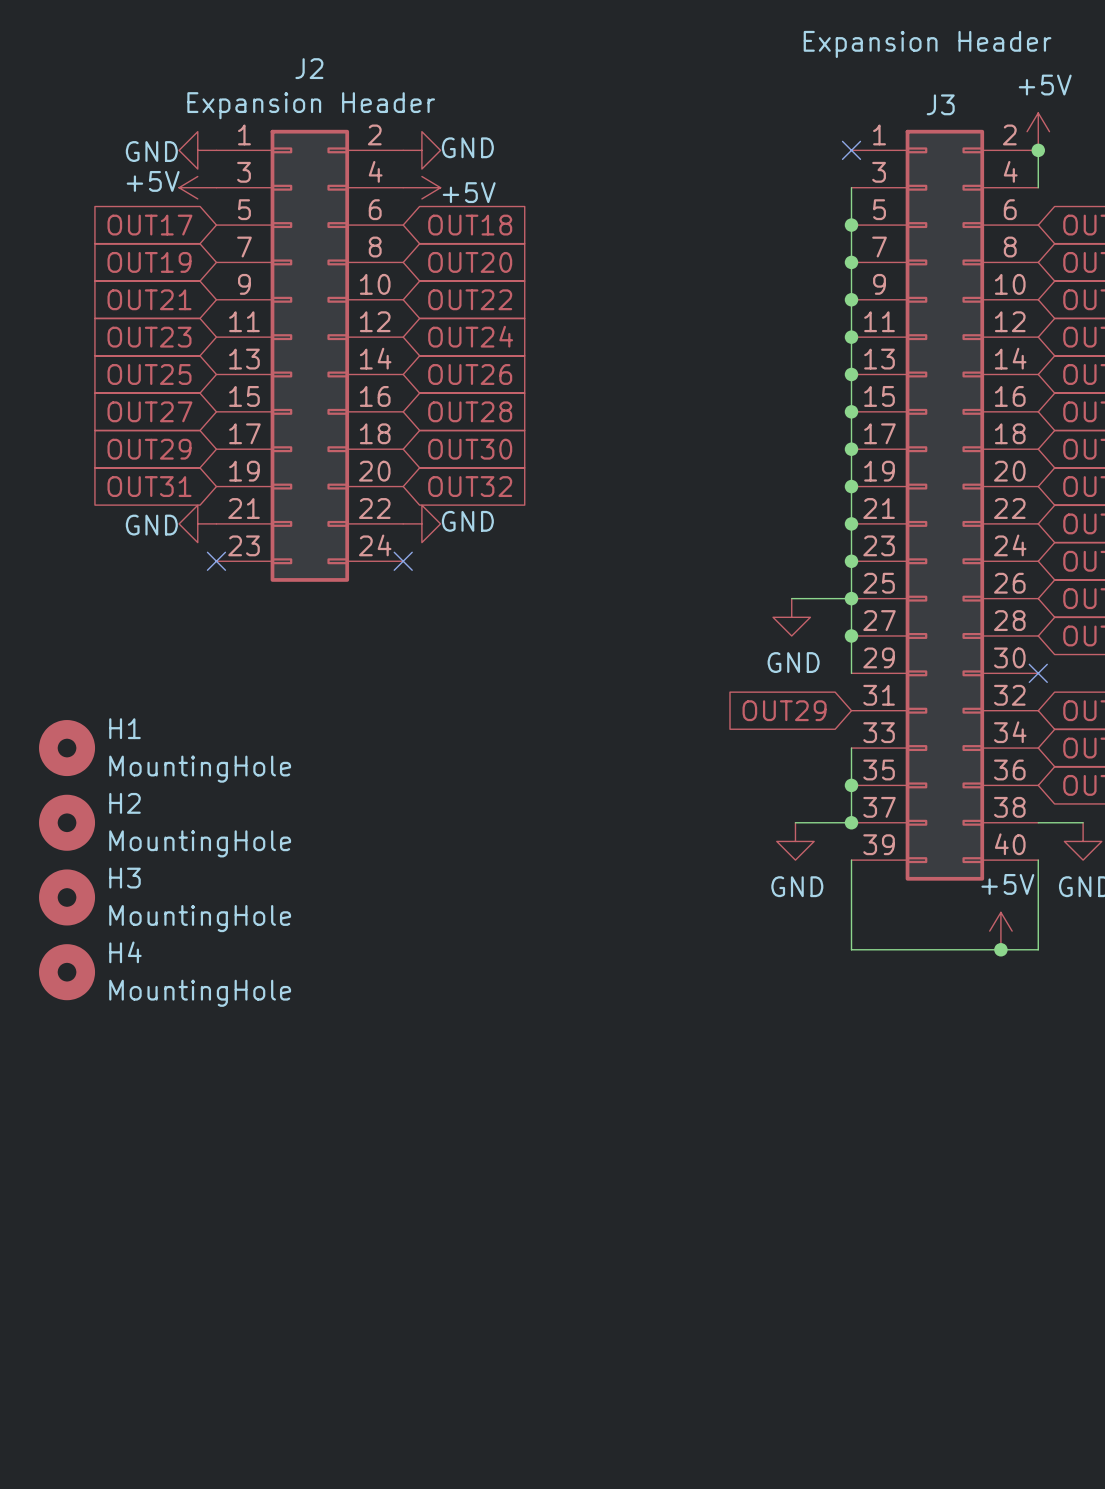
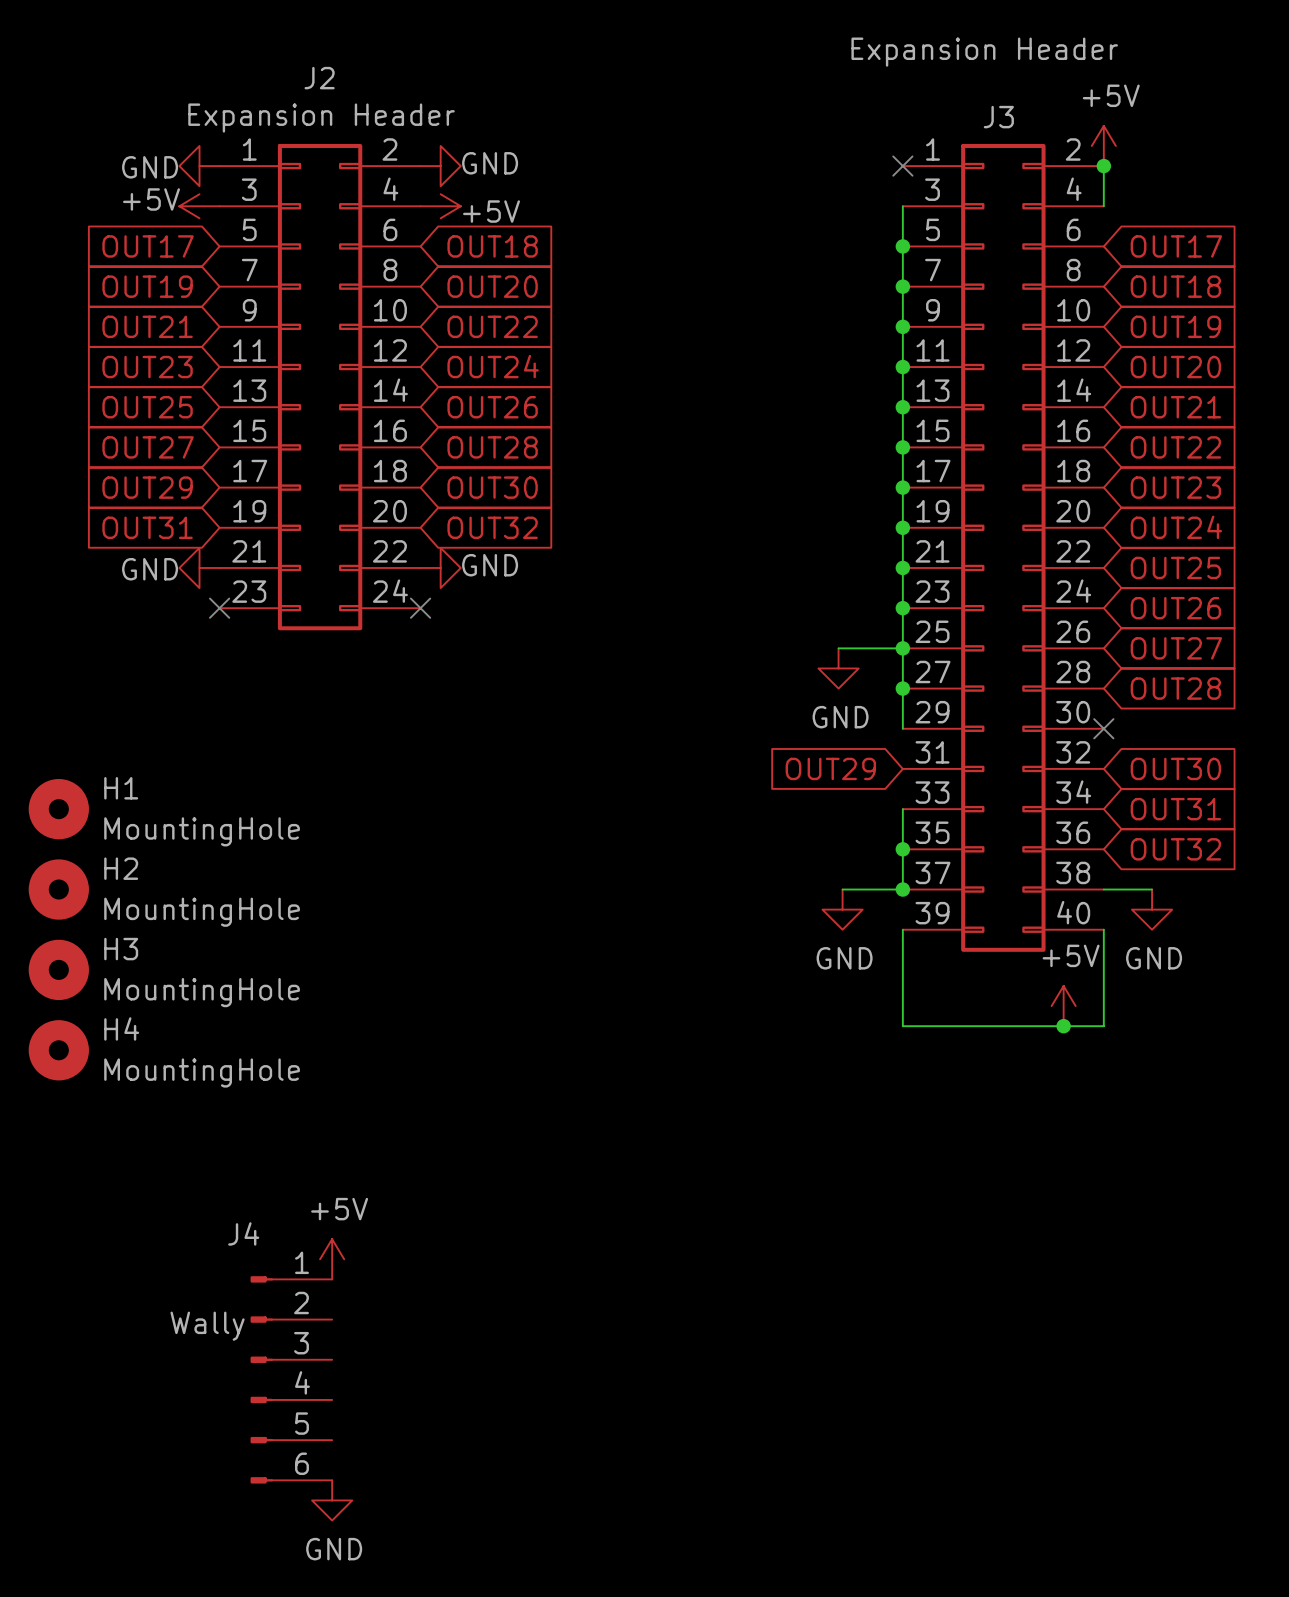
power symbol: none -> +5V (332, 1259)
J4: none -> Wally (291, 1379)
power symbol: none -> GND (332, 1500)

